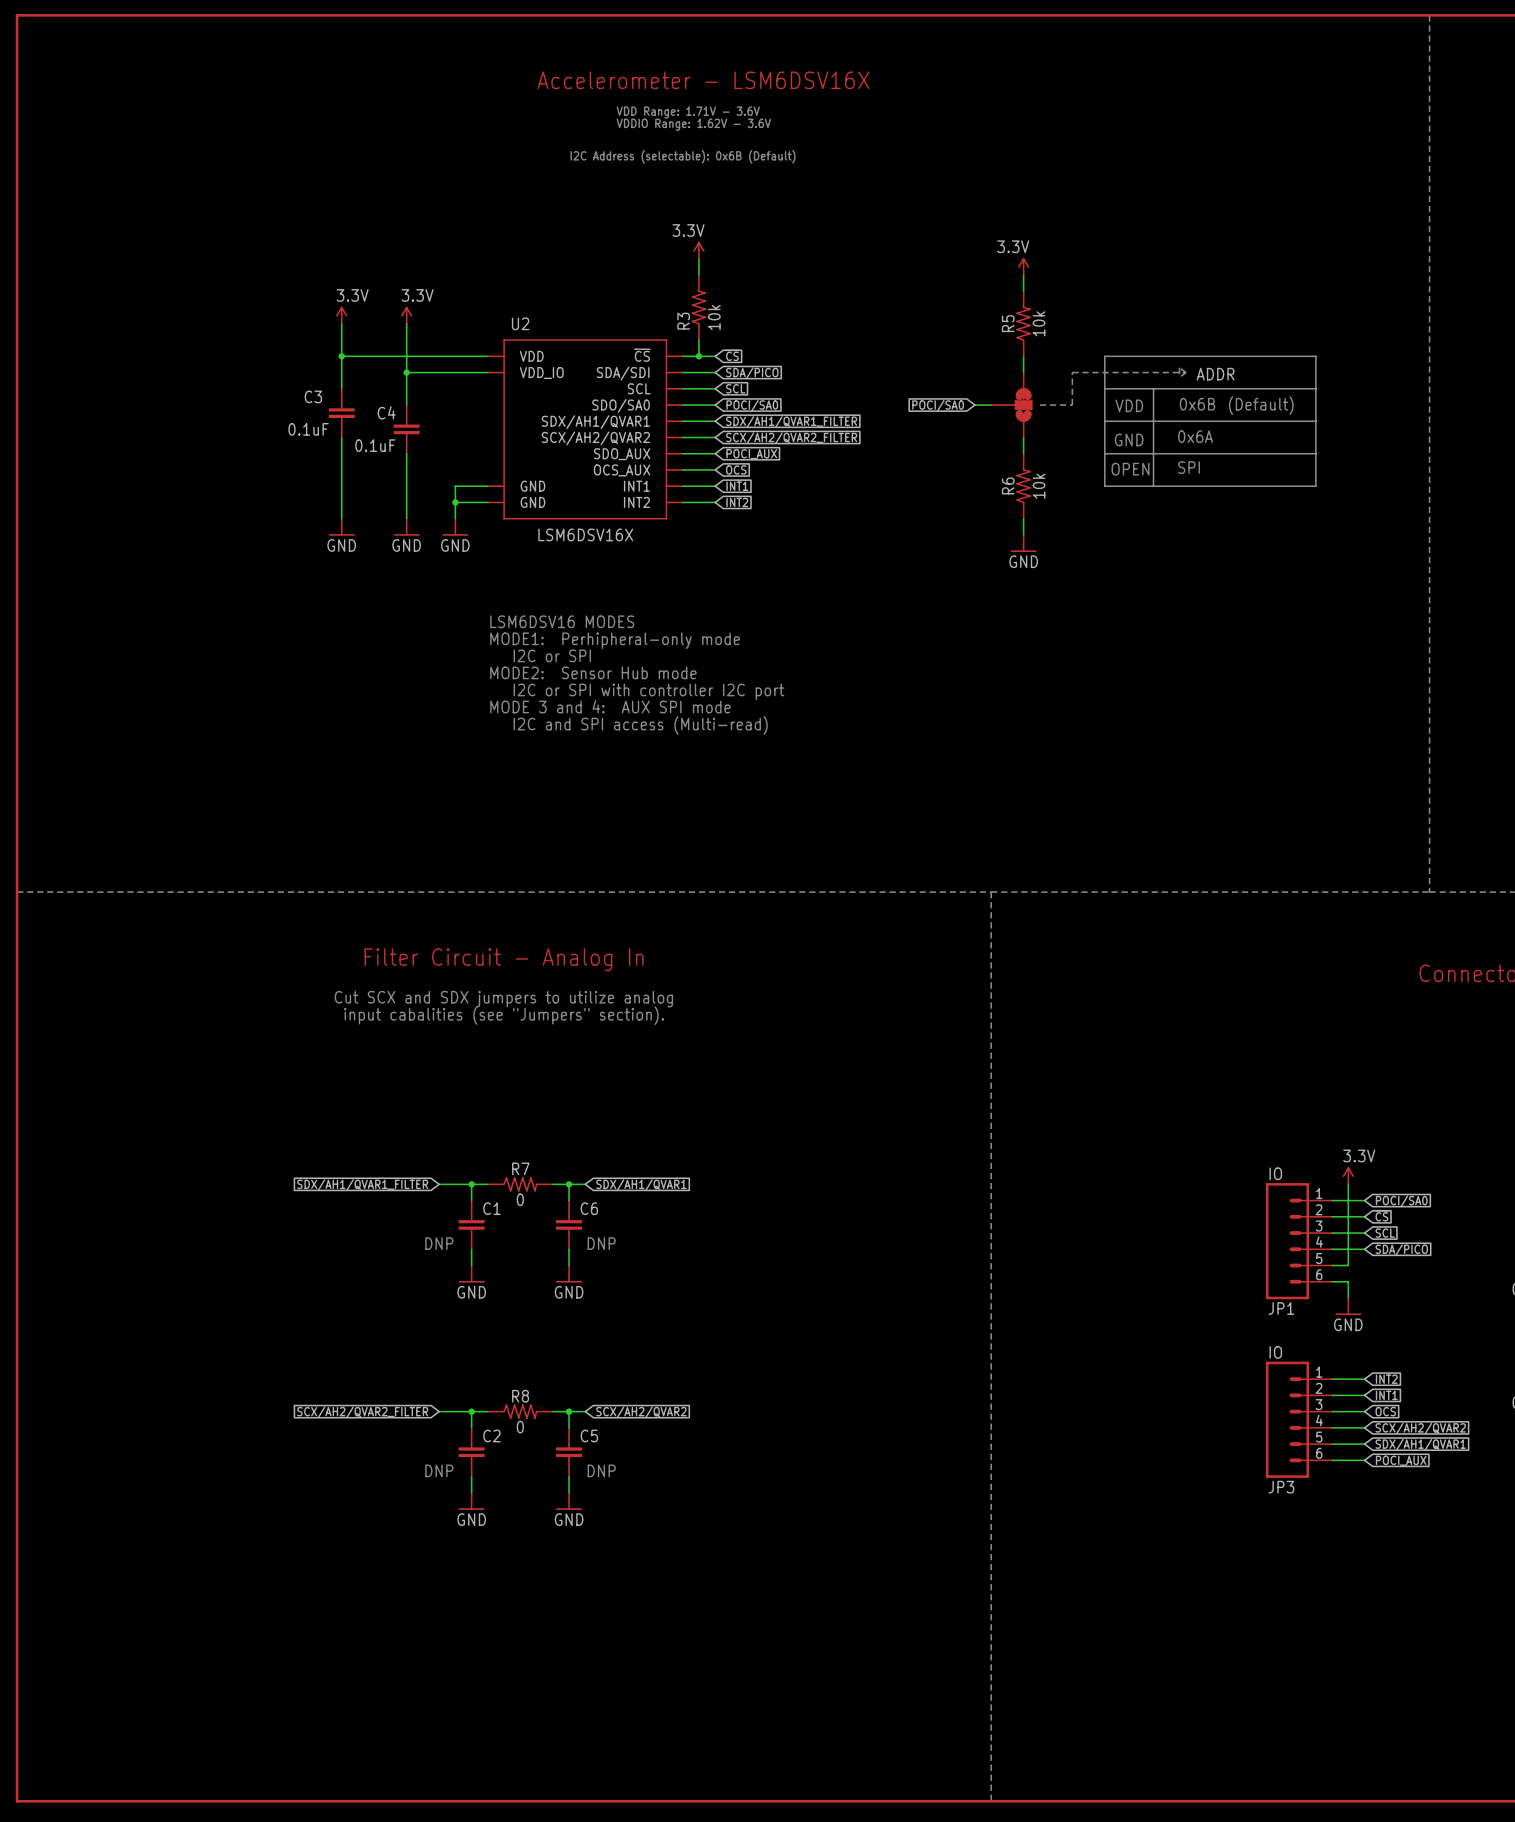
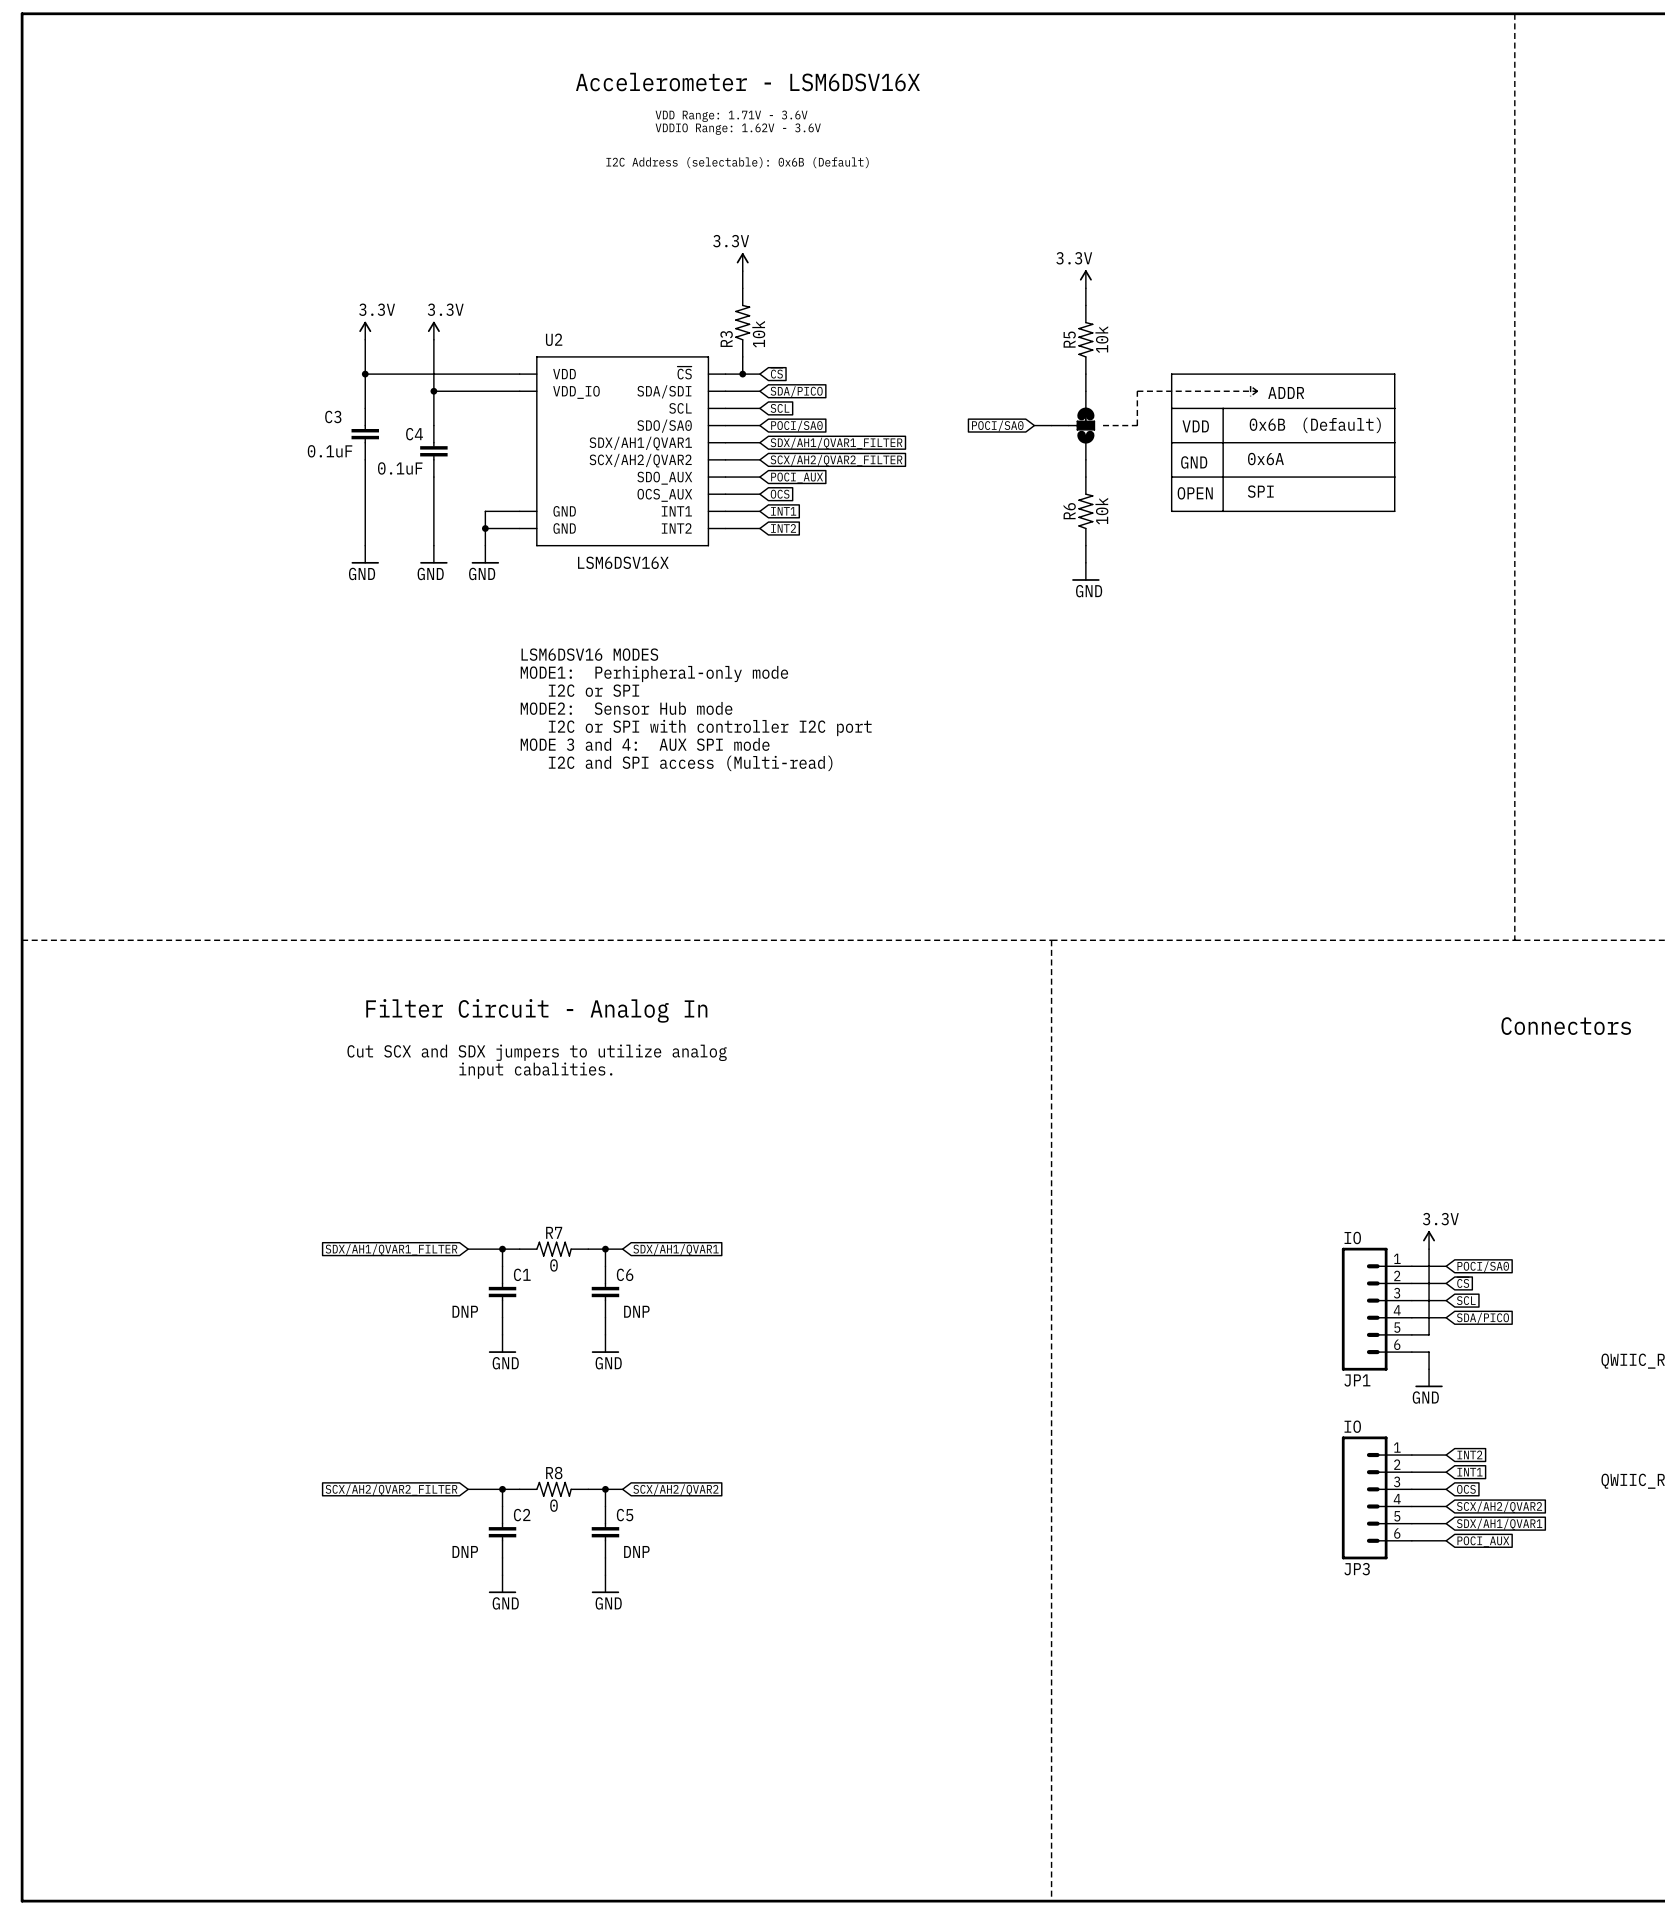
text: input cabalities (see "Jumpers" section). (504, 1015) -> input cabalities. (535, 1070)

